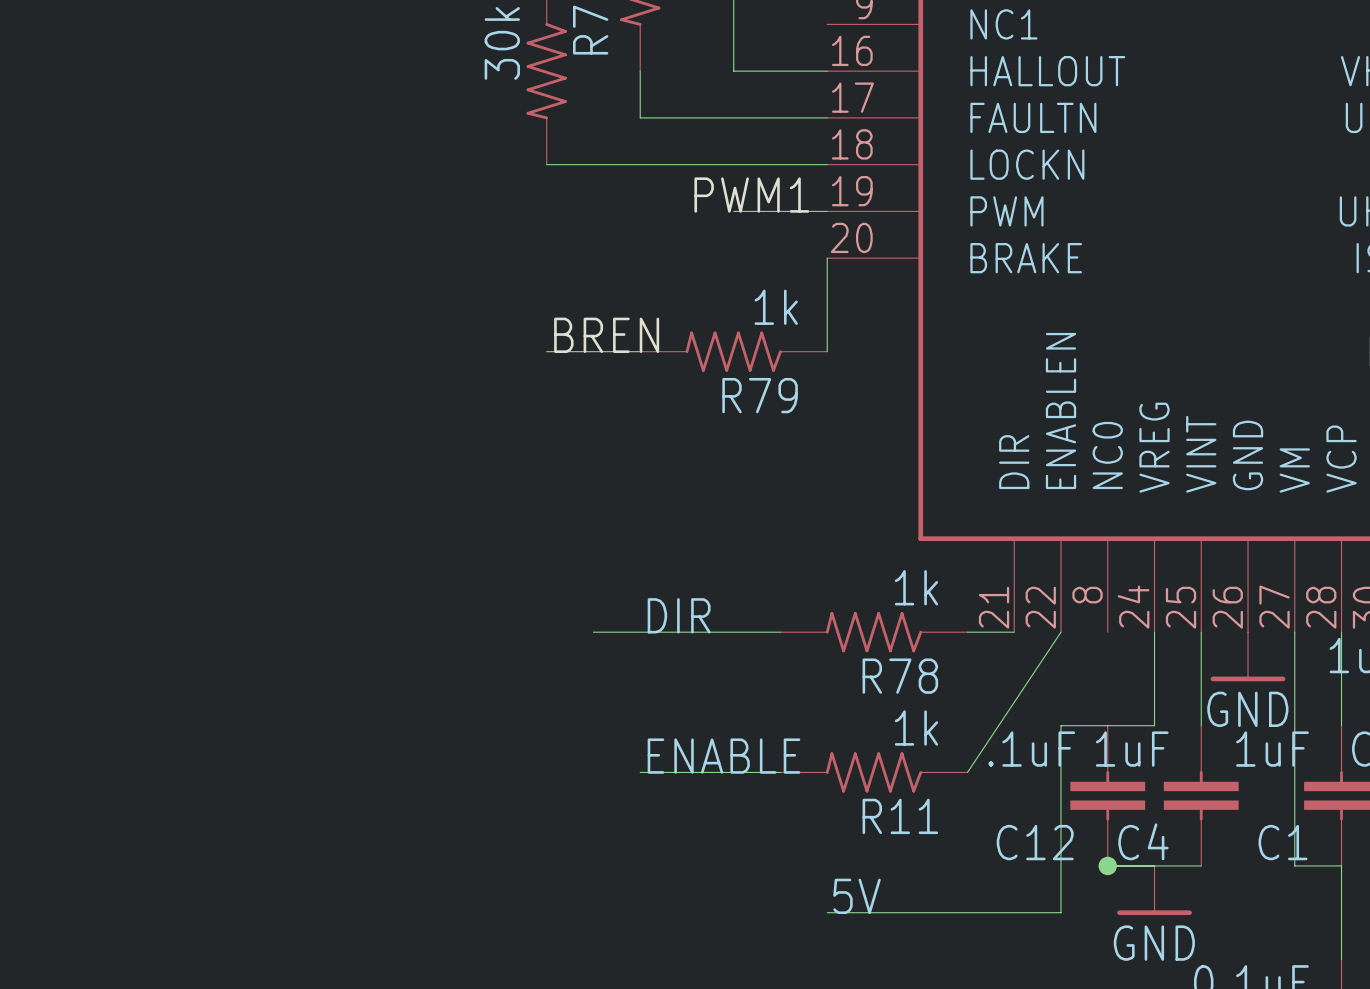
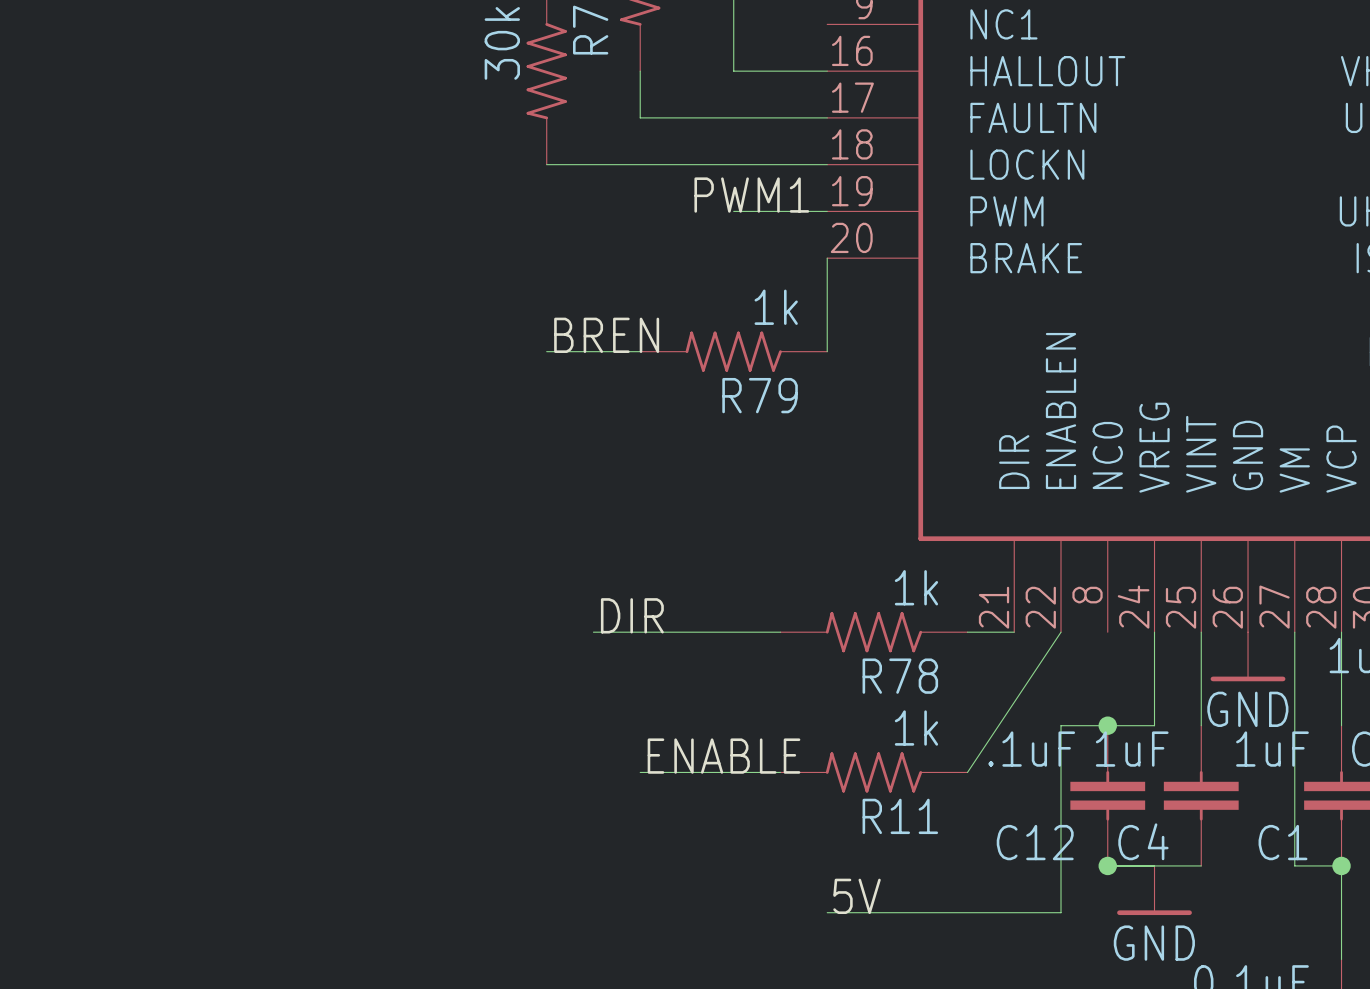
label: none -> DIR (632, 615)
text: DIR (679, 615) -> none
junction: none -> (1107, 725)
text: ENABLE (724, 756) -> none
label: none -> ENABLE (724, 756)
junction: none -> (1341, 865)
text: 5V (857, 896) -> none
label: none -> 5V (857, 896)

